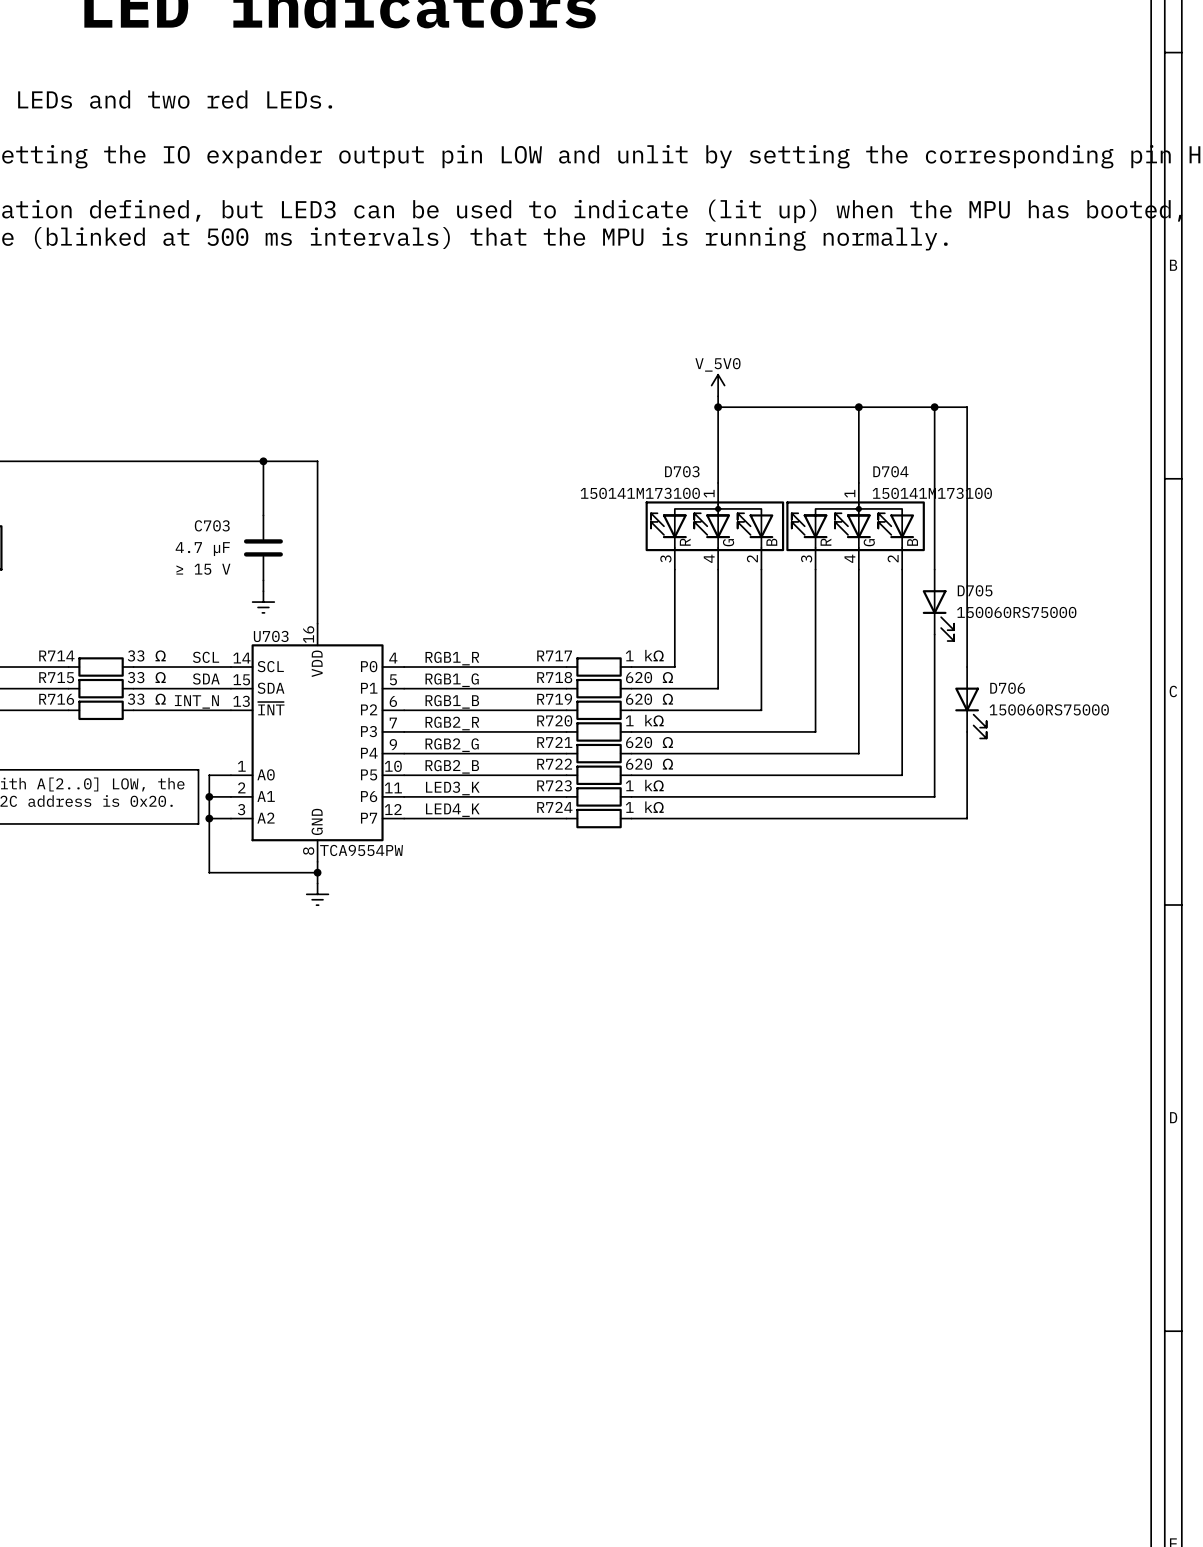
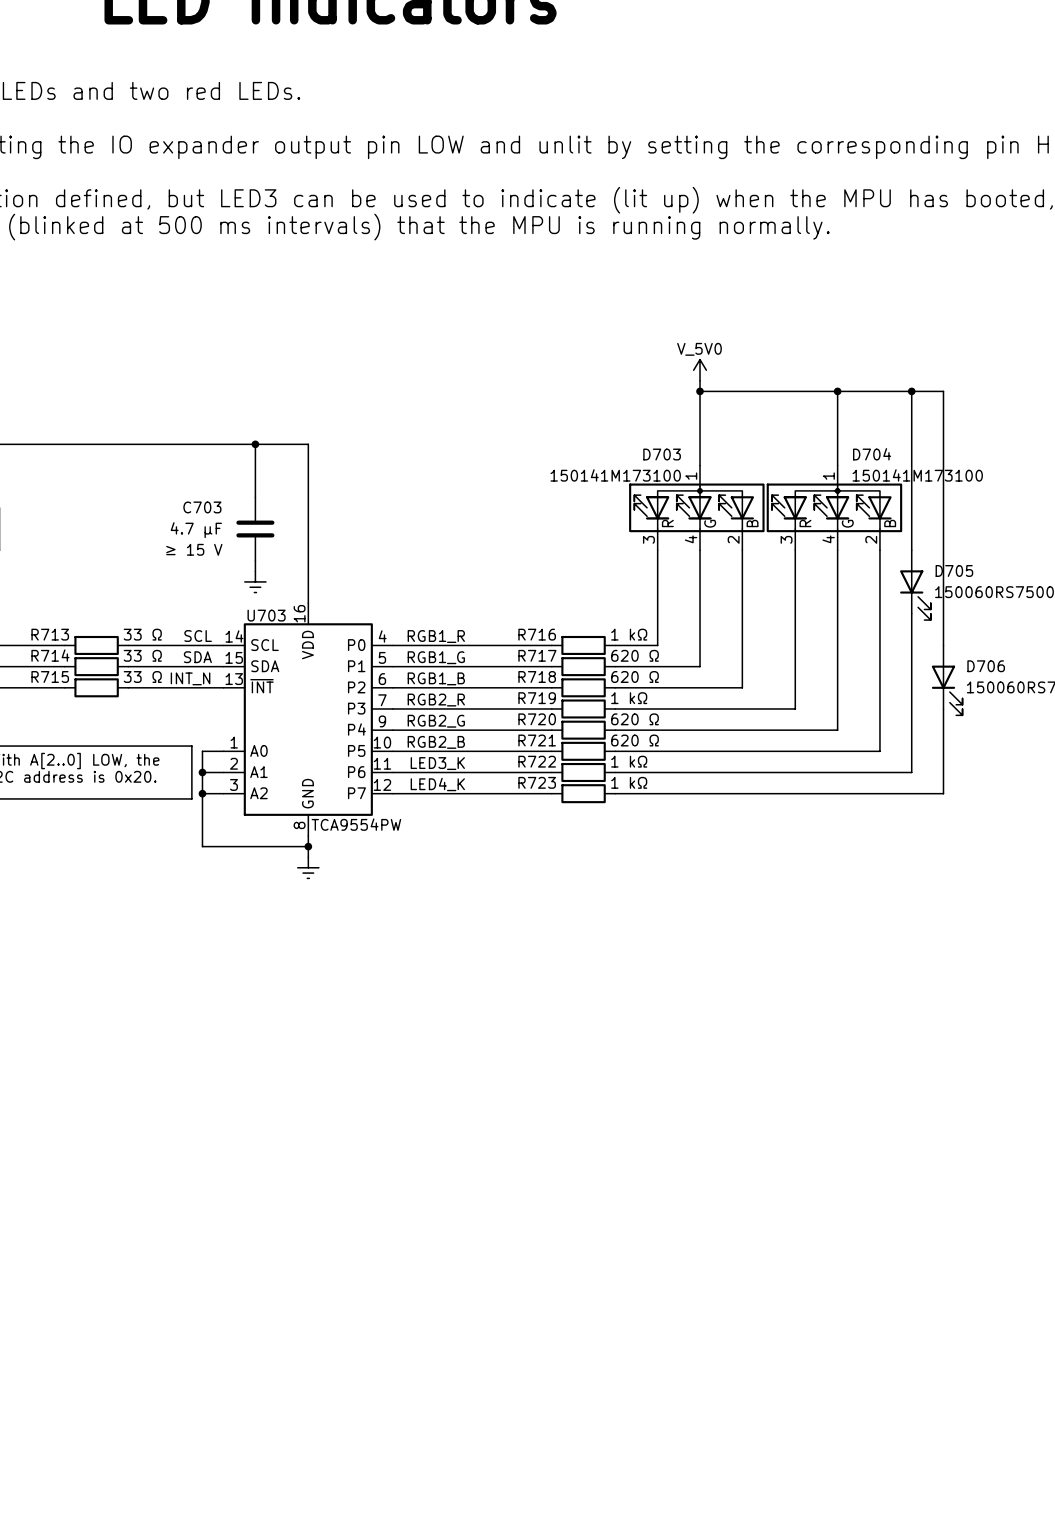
R714 name: R714 (56, 655) -> R713 (50, 634)
R717 name: R717 (554, 655) -> R716 (537, 634)
R715 name: R715 (56, 677) -> R714 (50, 655)
R718 name: R718 (554, 677) -> R717 (537, 655)
R716 name: R716 (56, 699) -> R715 (50, 676)
R719 name: R719 (554, 699) -> R718 (537, 676)
R720 name: R720 (554, 720) -> R719 (537, 698)
R721 name: R721 (554, 742) -> R720 (537, 719)
R722 name: R722 (554, 764) -> R721 (537, 740)
R723 name: R723 (554, 785) -> R722 (537, 761)
R724 name: R724 (554, 807) -> R723 (537, 782)

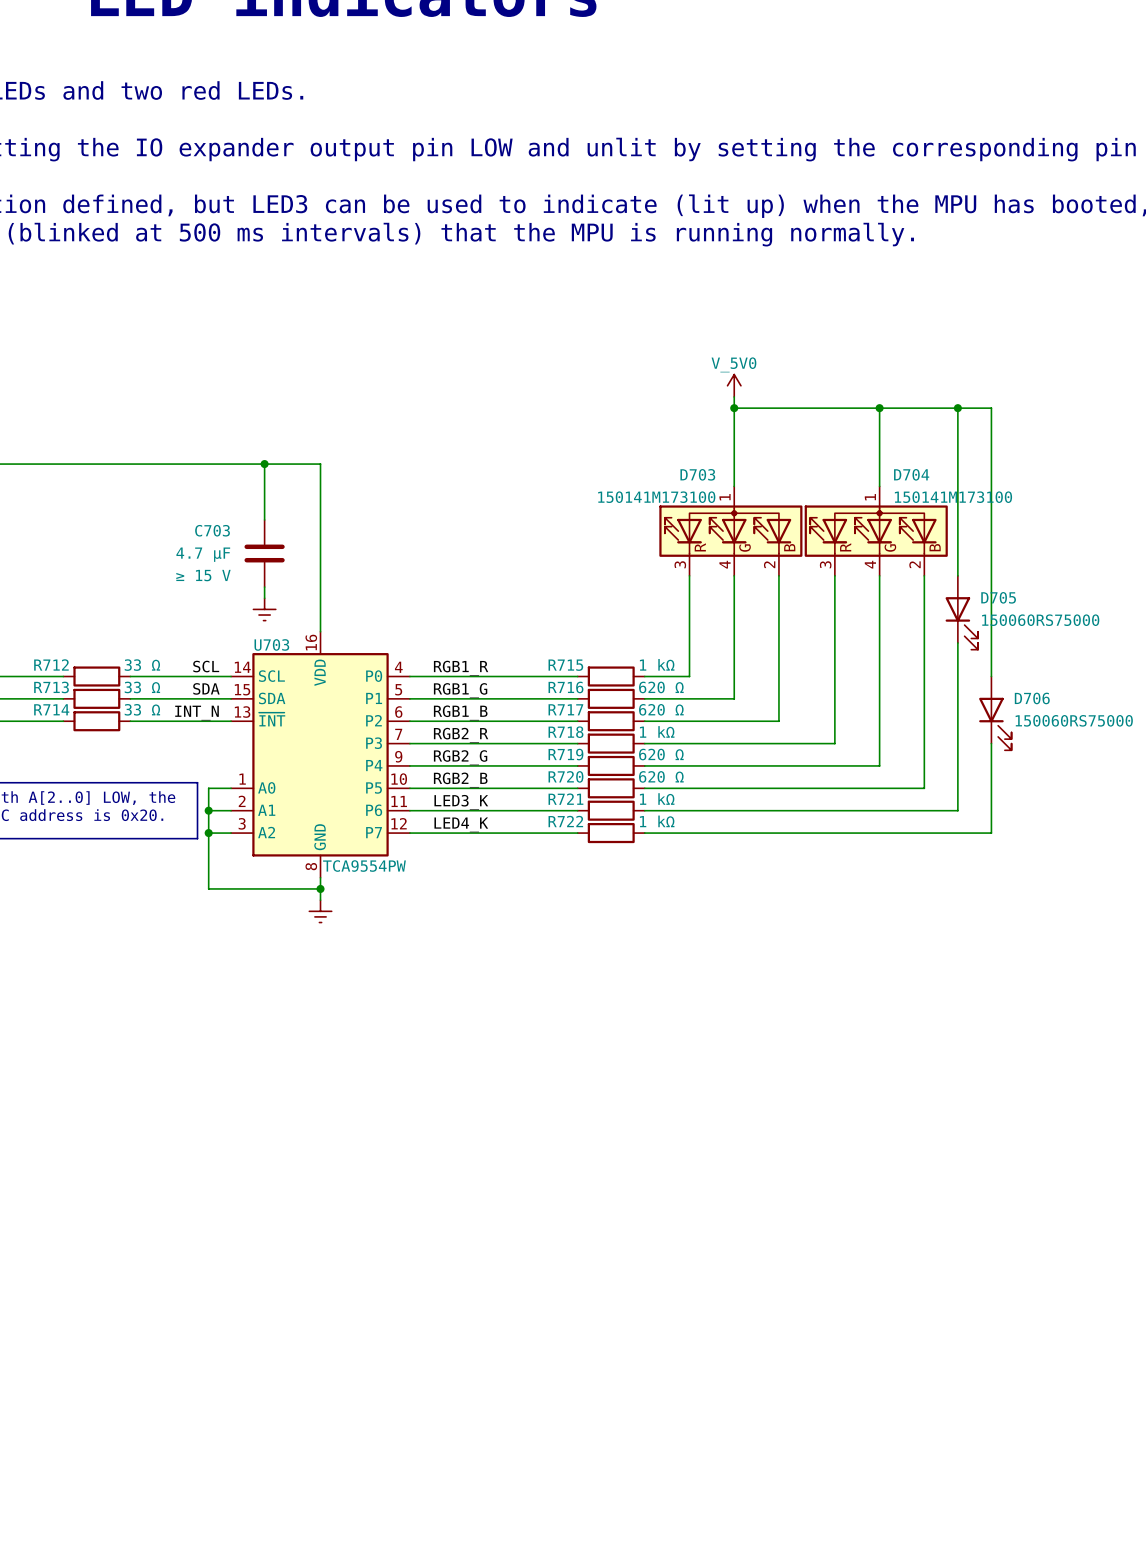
R713 name: R713 (50, 634) -> R712 (51, 664)
R716 name: R716 (537, 634) -> R715 (565, 665)
R714 name: R714 (50, 655) -> R713 (51, 687)
R717 name: R717 (537, 655) -> R716 (565, 687)
R715 name: R715 (50, 676) -> R714 (51, 709)
R718 name: R718 (537, 676) -> R717 (565, 709)
R719 name: R719 (537, 698) -> R718 (565, 732)
R720 name: R720 (537, 719) -> R719 (565, 754)
R721 name: R721 (537, 740) -> R720 (565, 776)
R722 name: R722 (537, 761) -> R721 (565, 799)
R723 name: R723 (537, 782) -> R722 (565, 821)

